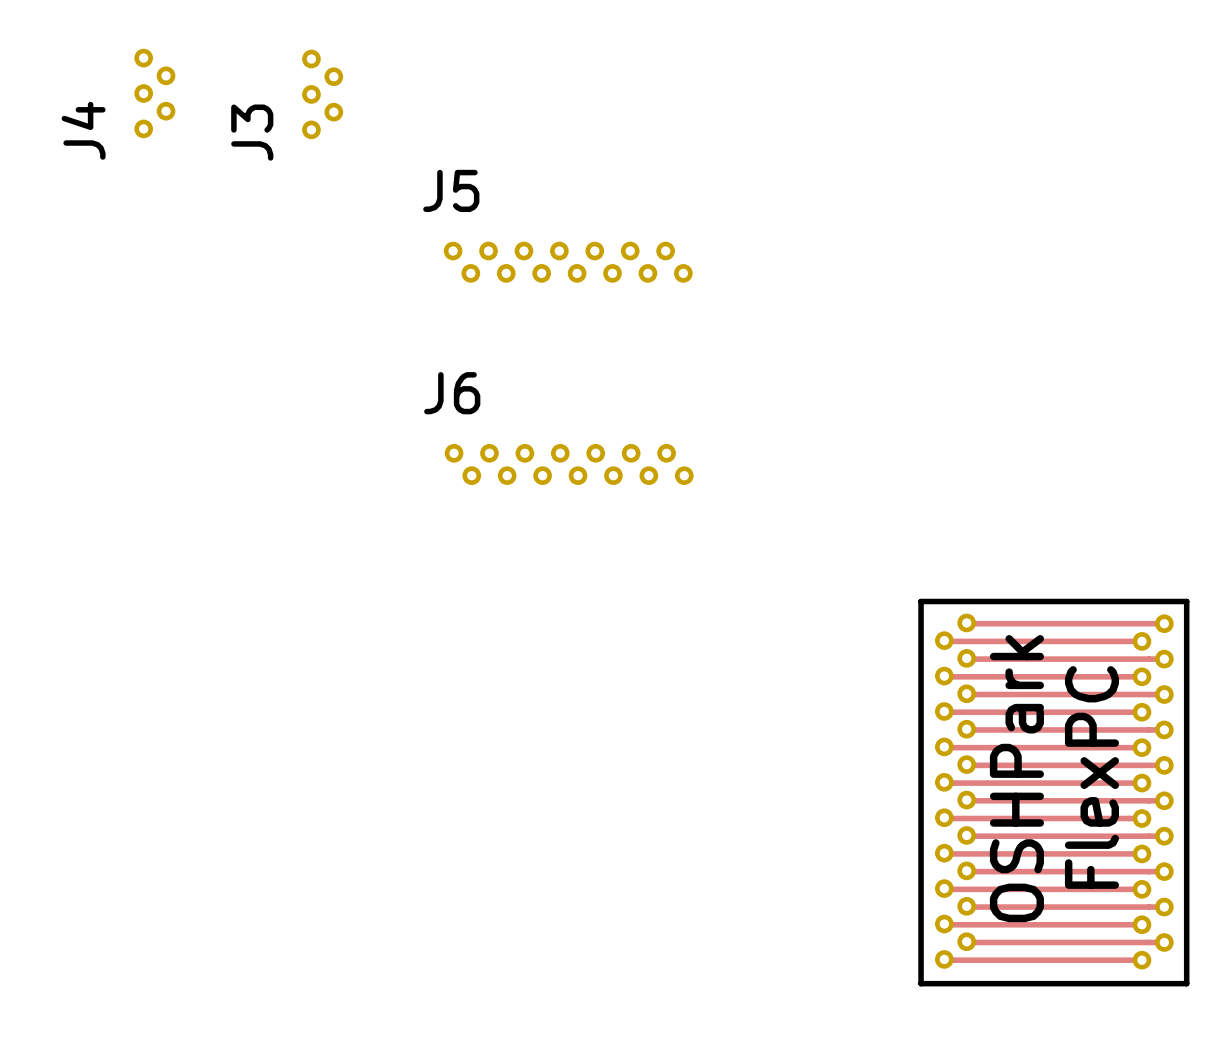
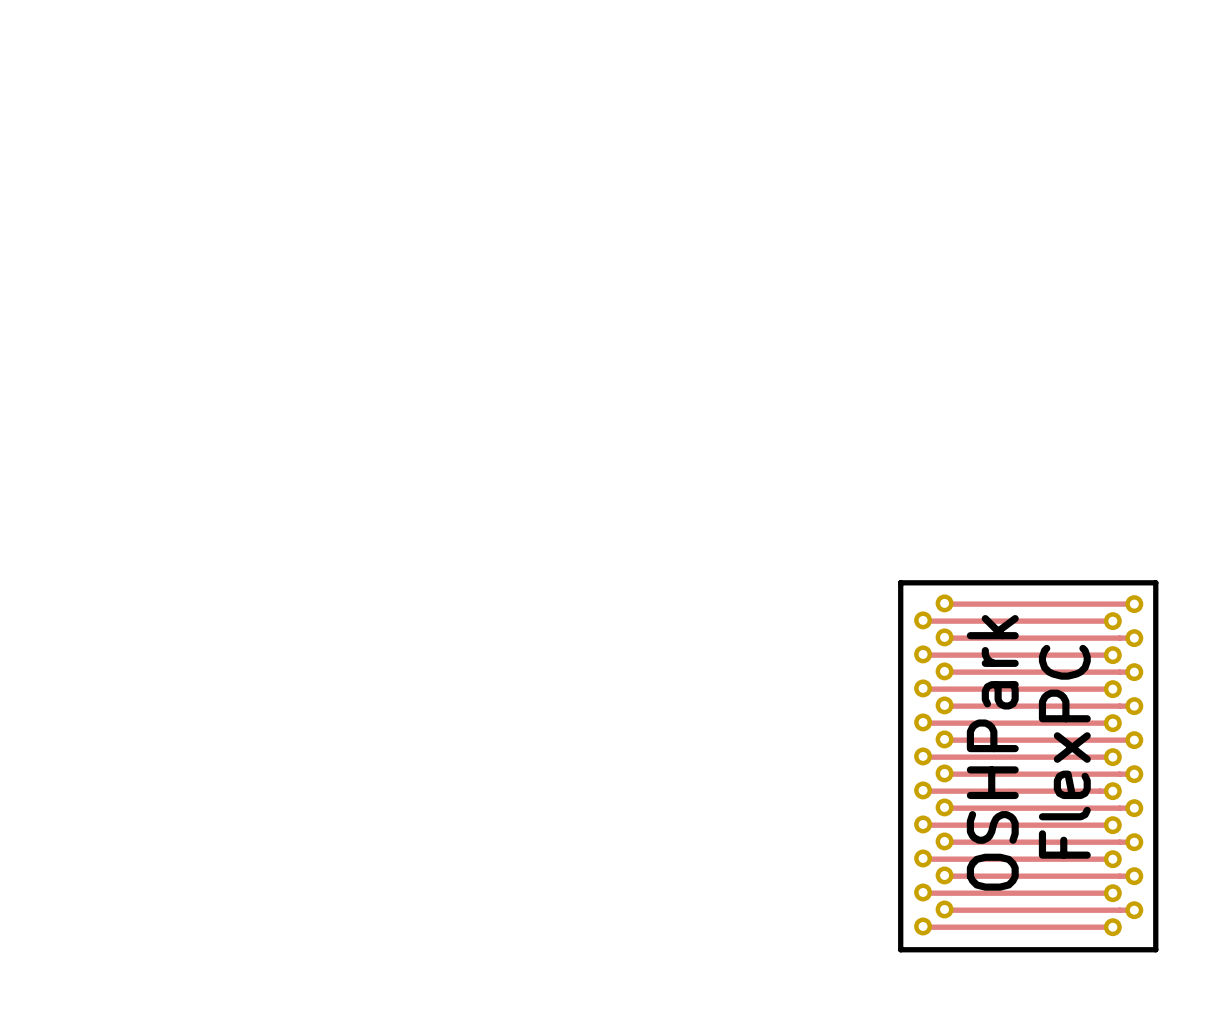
J4: (154, 93) -> none
J3: (322, 94) -> none
J5: (568, 262) -> none
J6: (569, 464) -> none

